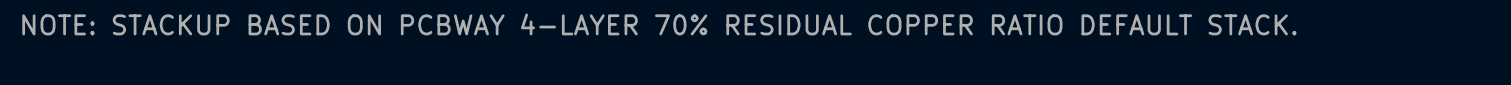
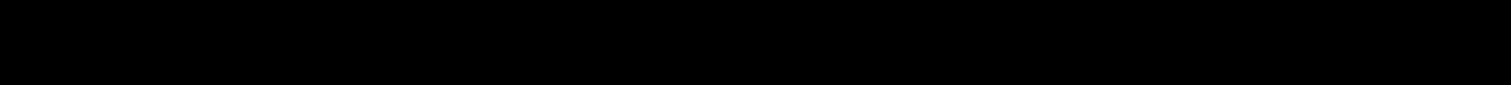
text: NOTE: STACKUP BASED ON PCBWAY 4-LAYER 70% RESIDUAL COPPER RATIO DEFAULT STACK. (659, 24) -> none

